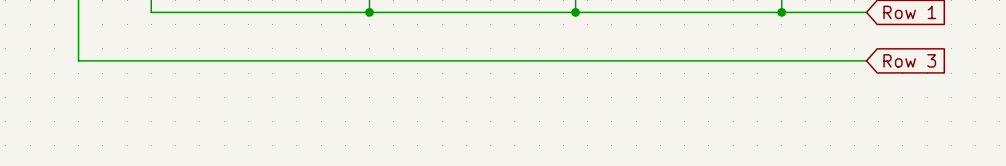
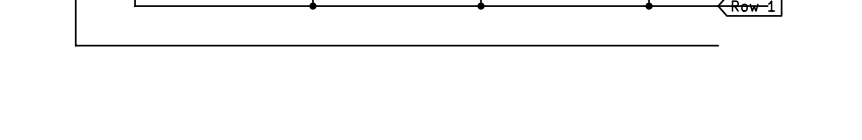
wire: none -> (718, 6) (767, 6)
global label: Row 3 (909, 60) -> none

